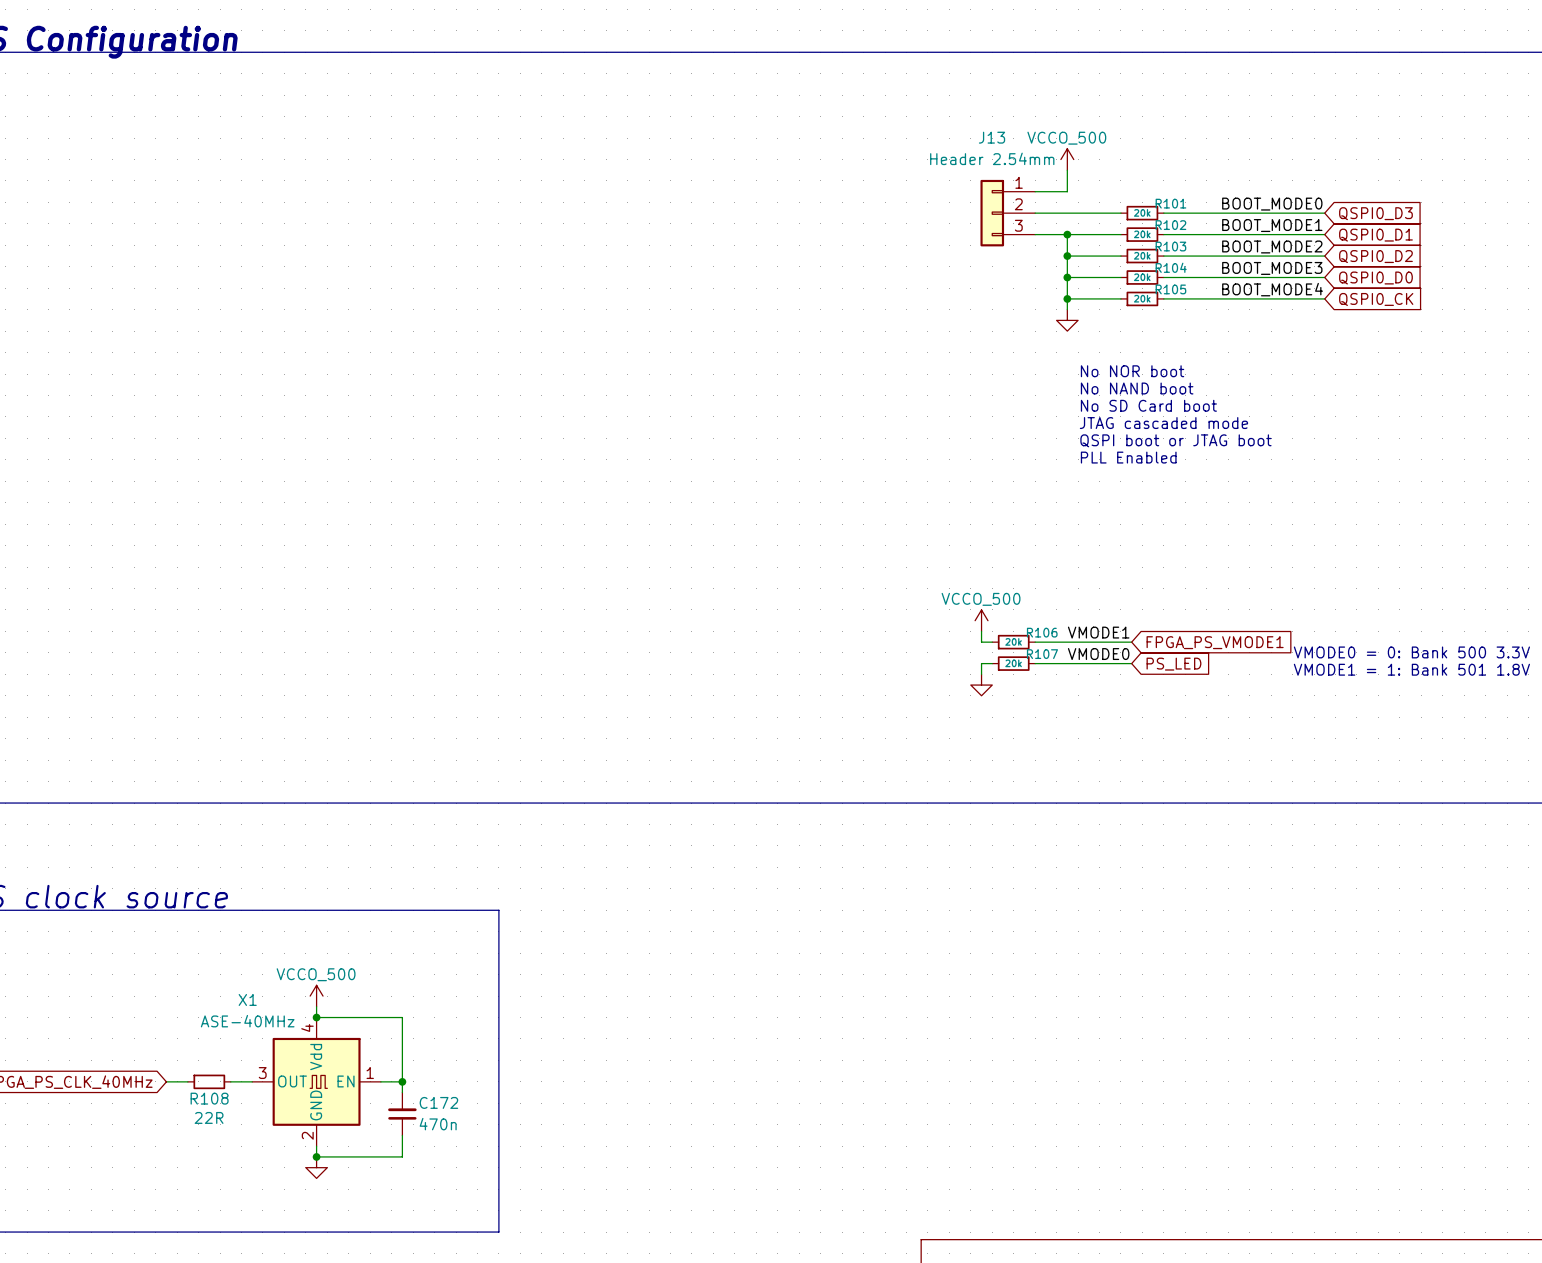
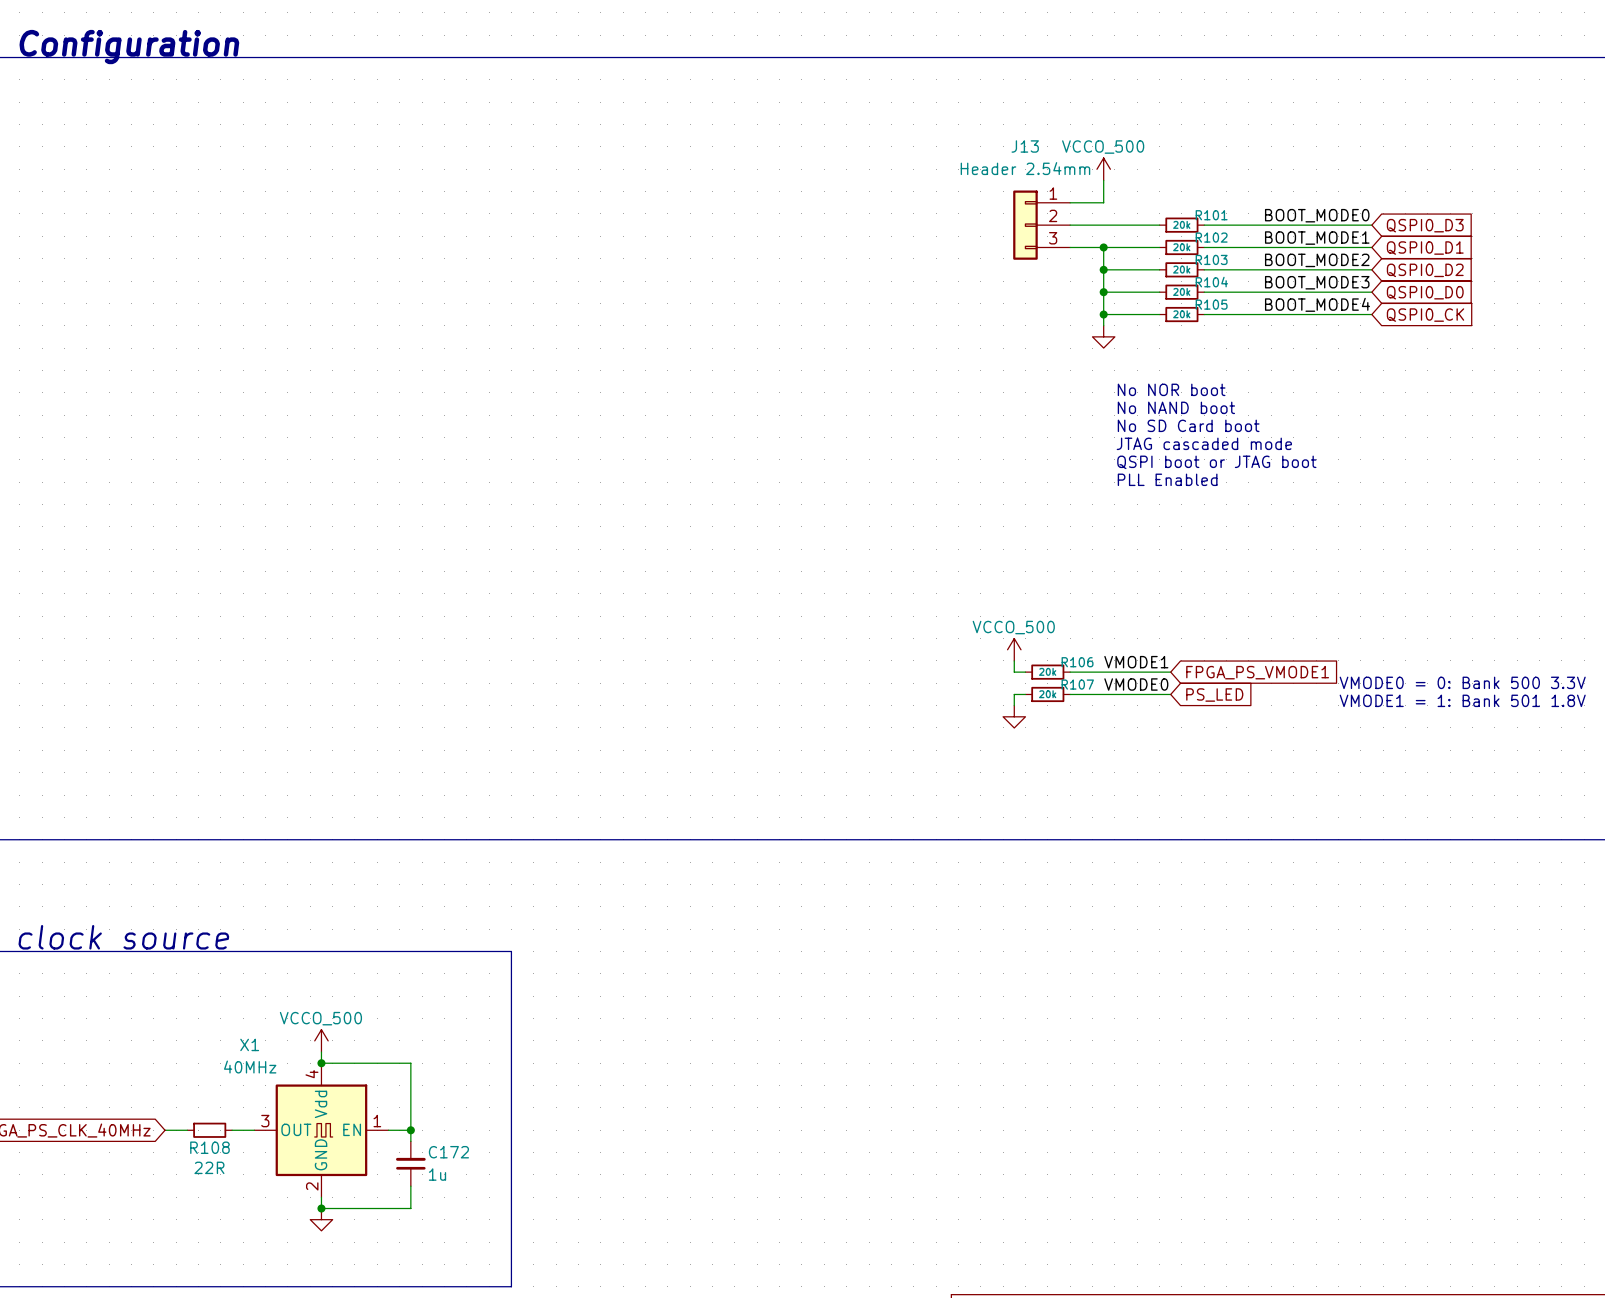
X1 value: ASE-40MHz (247, 1021) -> 40MHz (250, 1067)
C172 value: 470n (438, 1124) -> 1u (437, 1174)

